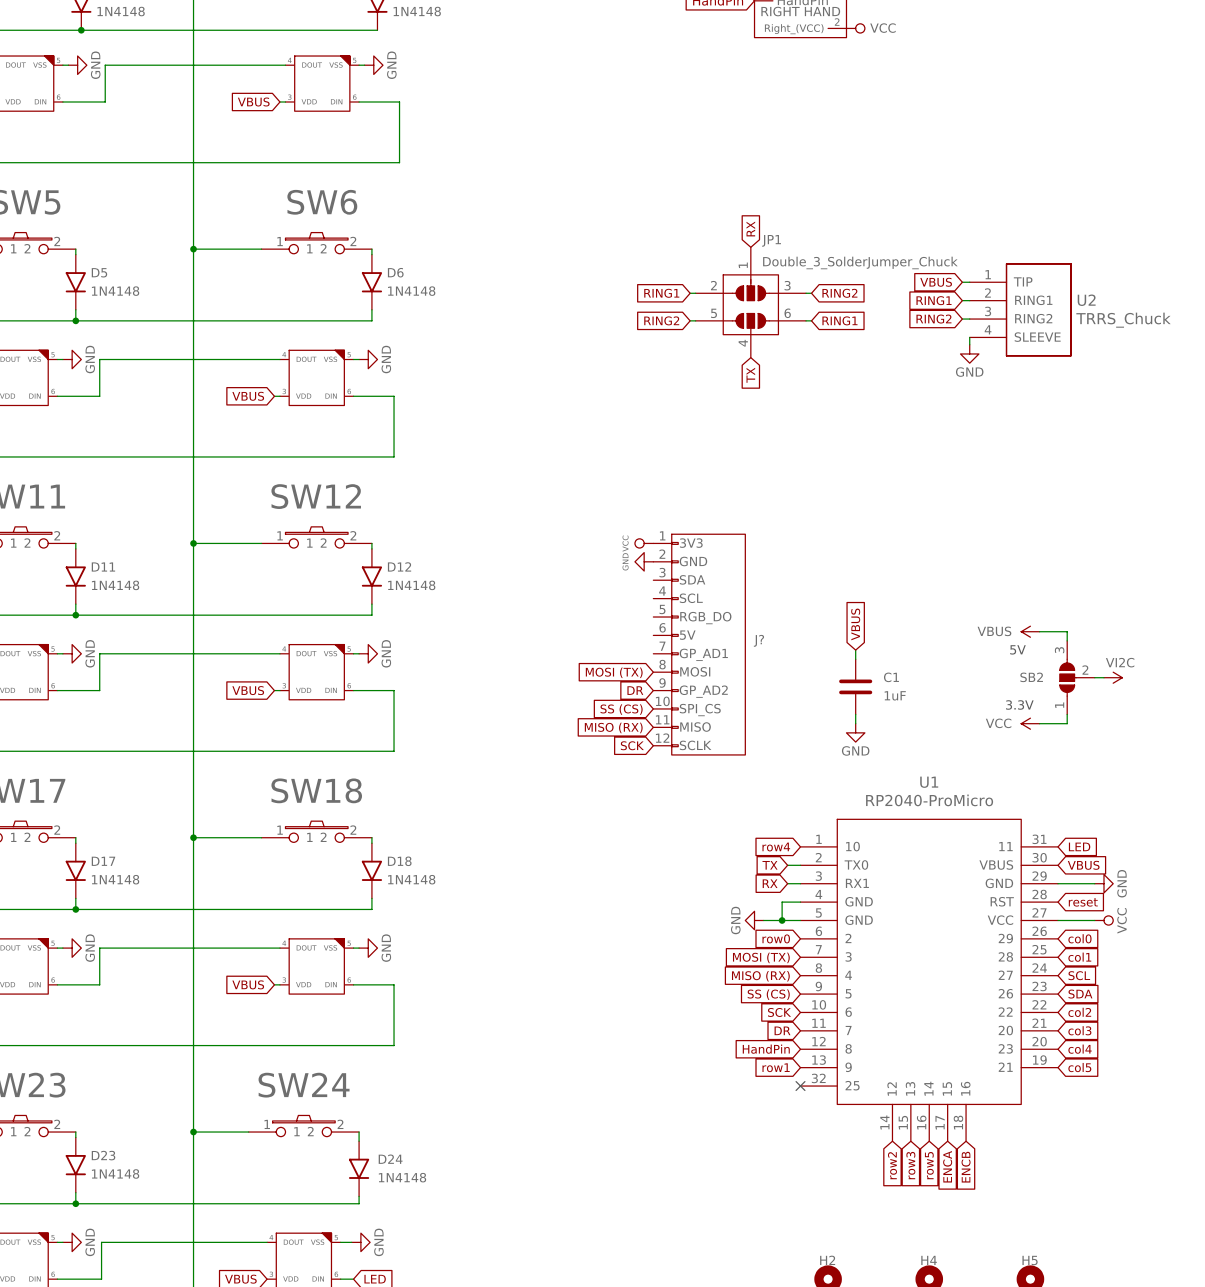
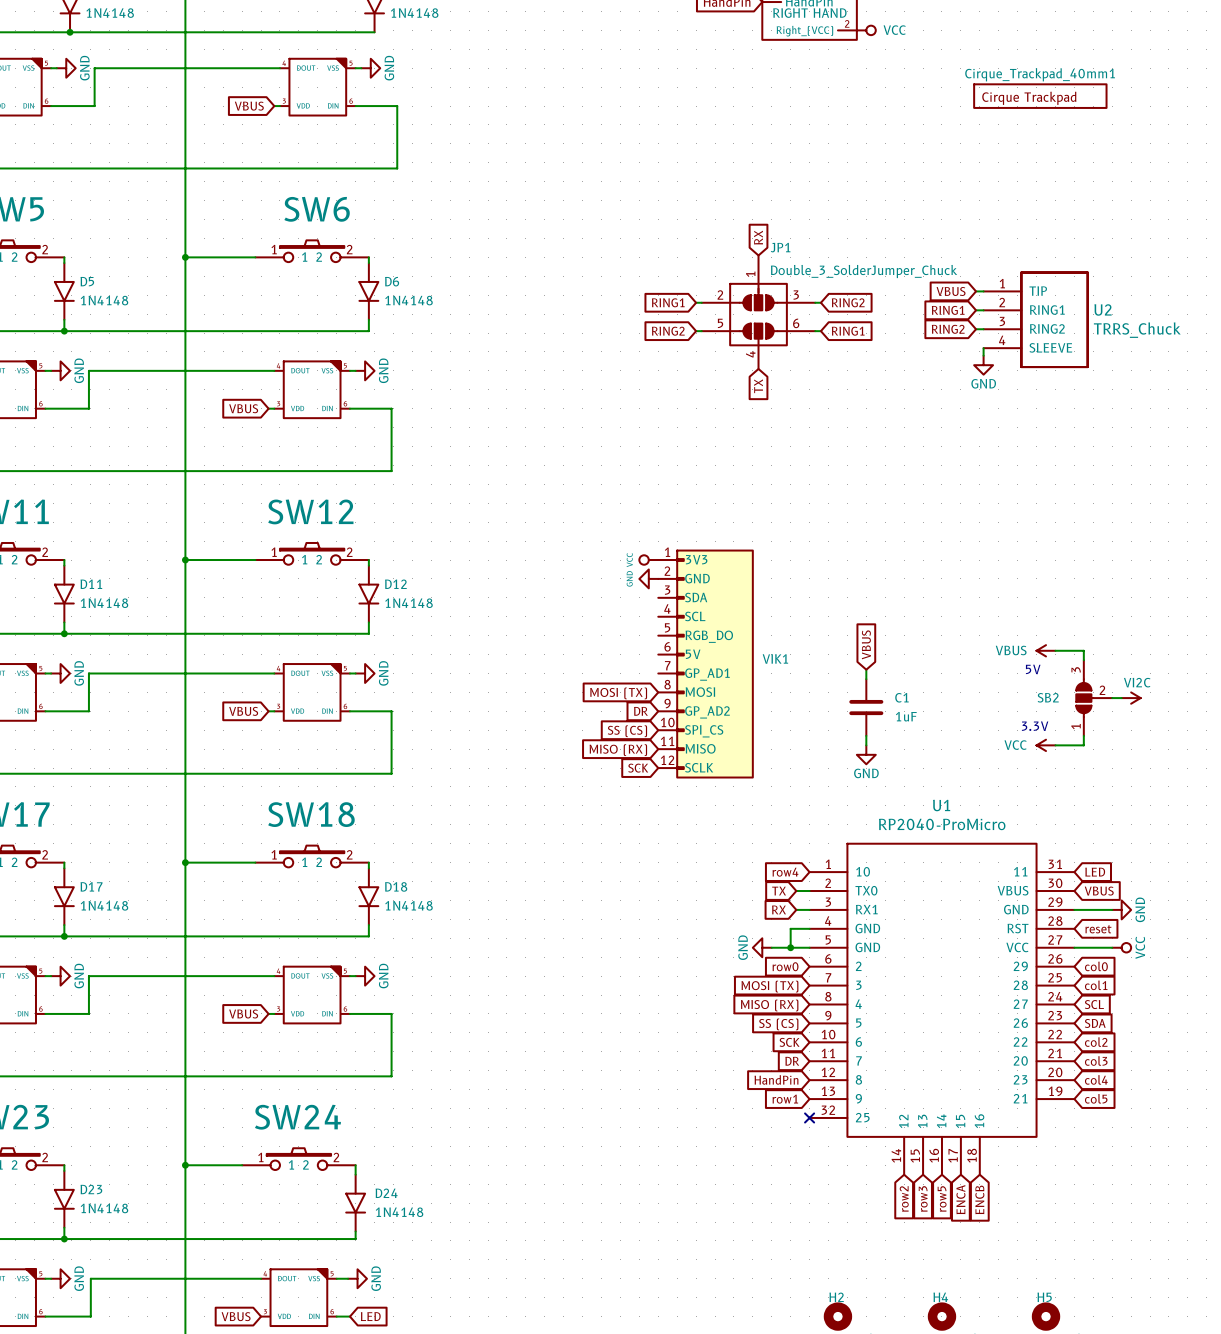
Cirque_Trackpad_40mm1: none -> (1040, 96)
J? name: J? (758, 640) -> VIK1 (775, 659)

